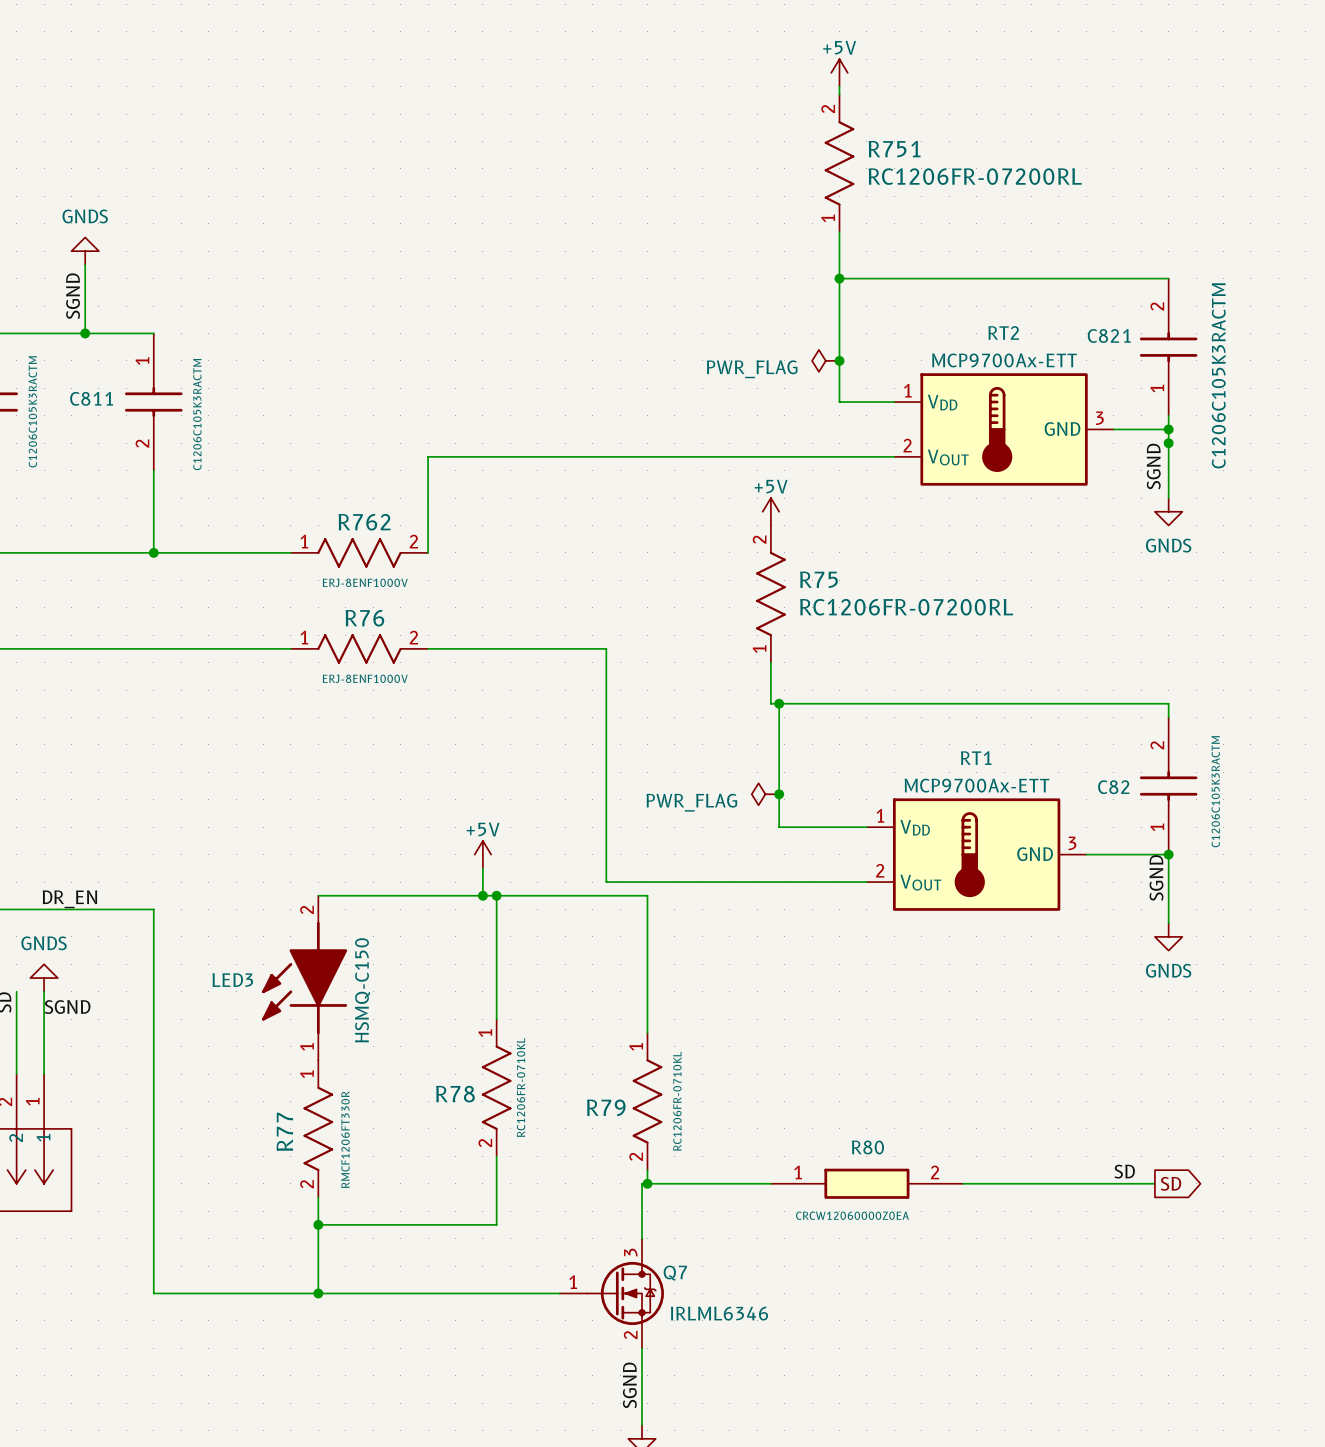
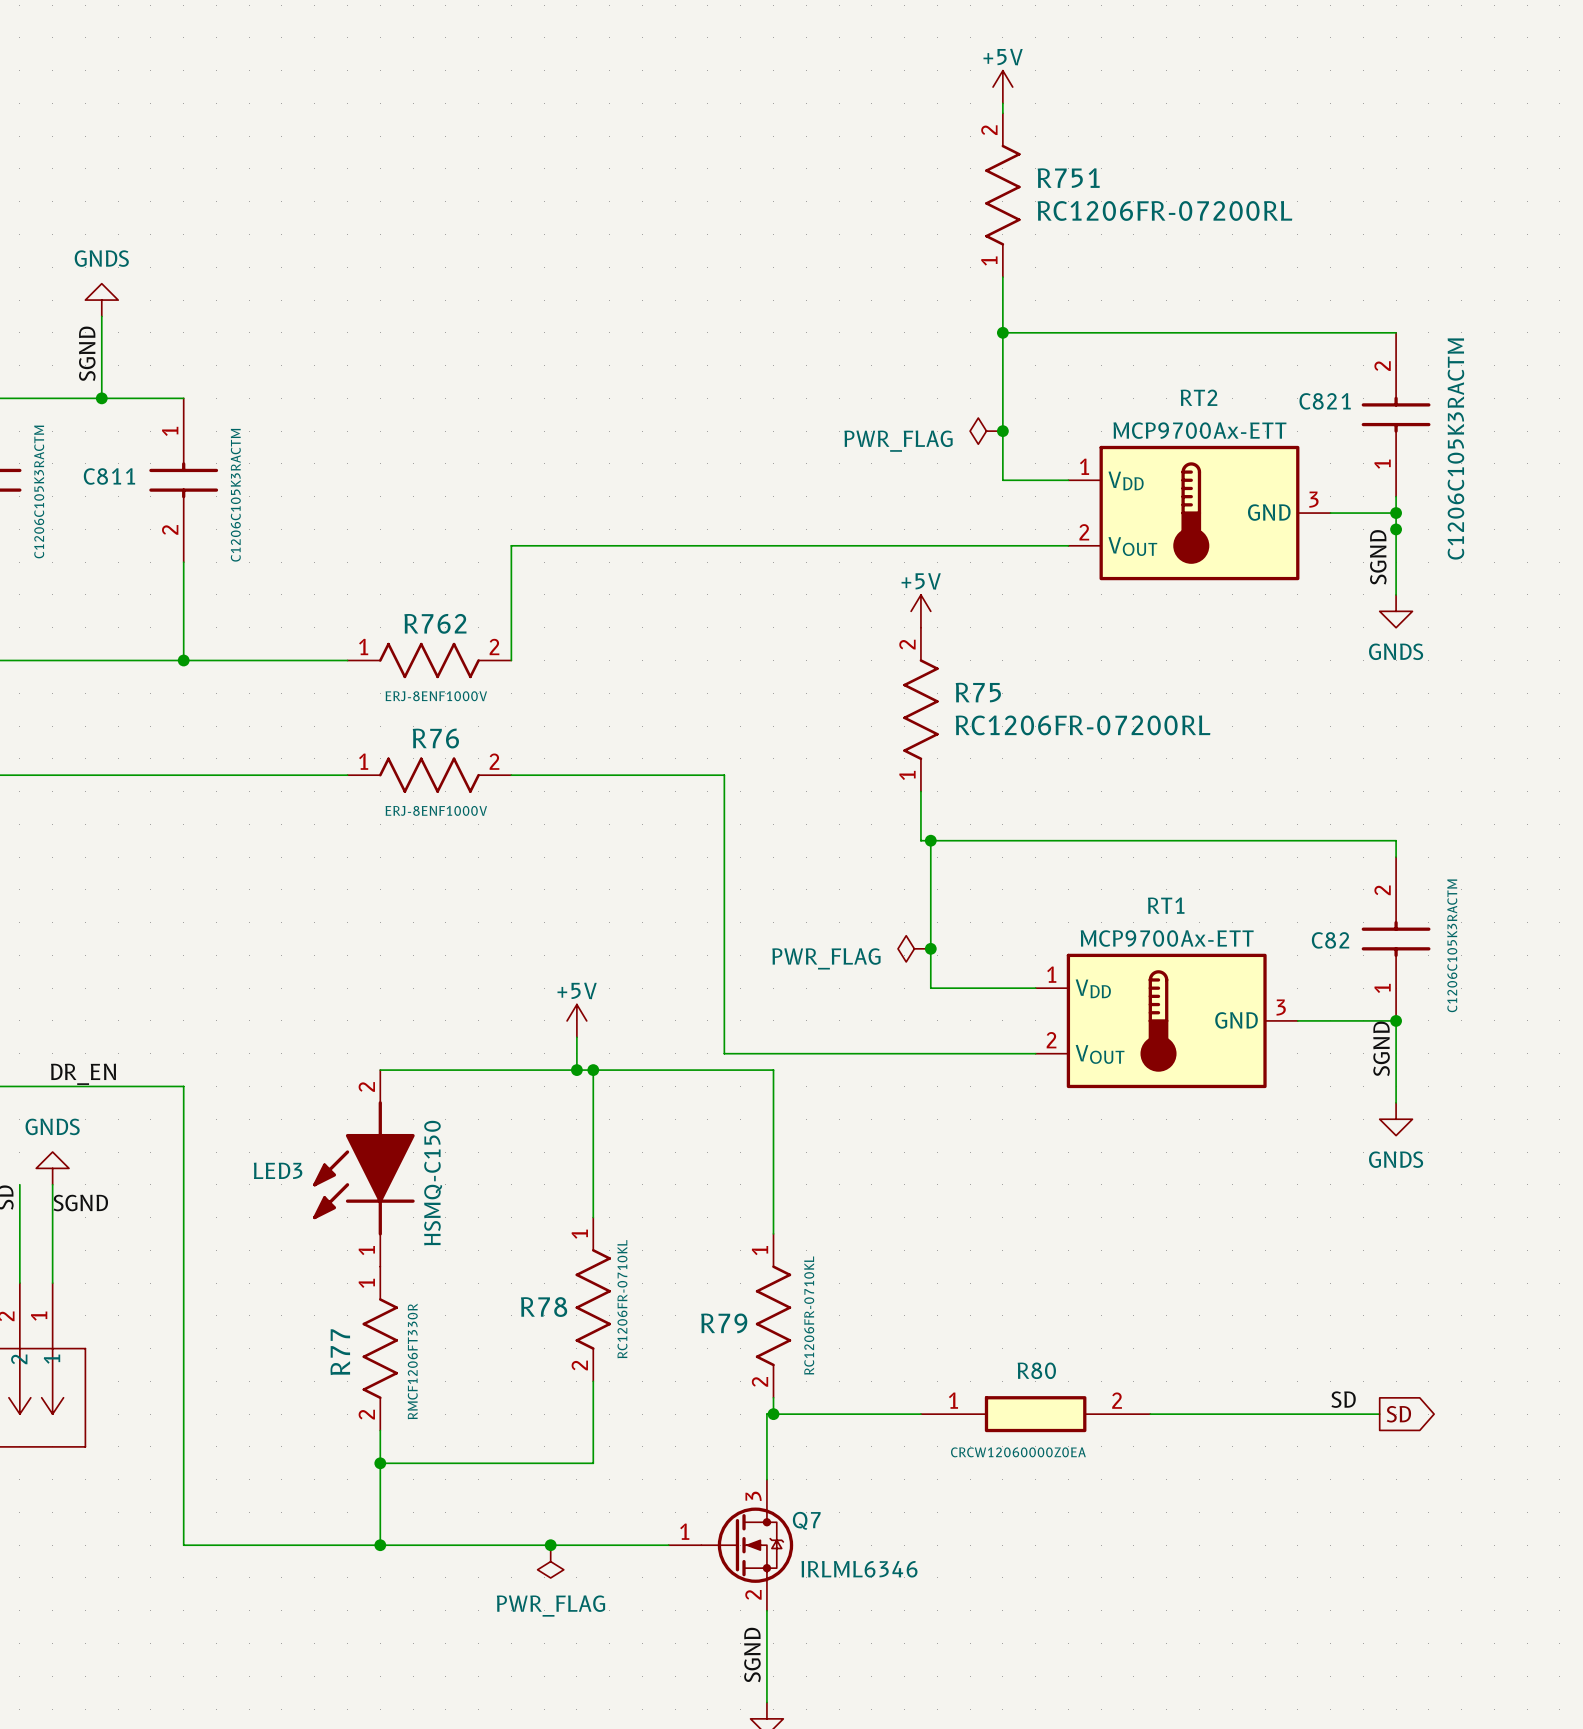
junction: none -> (550, 1545)
power symbol: none -> PWR_FLAG (550, 1561)

